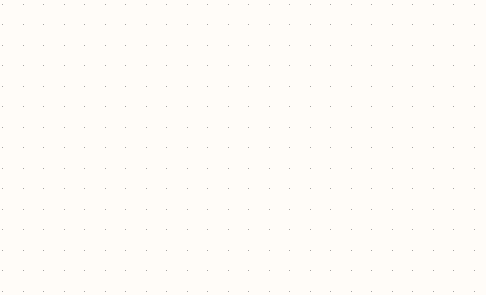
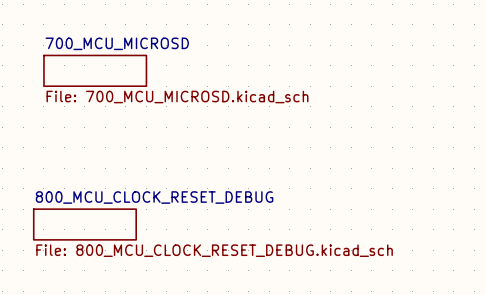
sheet 700_MCU_MICROSD: none -> File: 700_MCU_MICROSD.kicad_sch (95, 70)
sheet 800_MCU_CLOCK_RESET_DEBUG: none -> File: 800_MCU_CLOCK_RESET_DEBUG.kicad_sch (84, 224)

